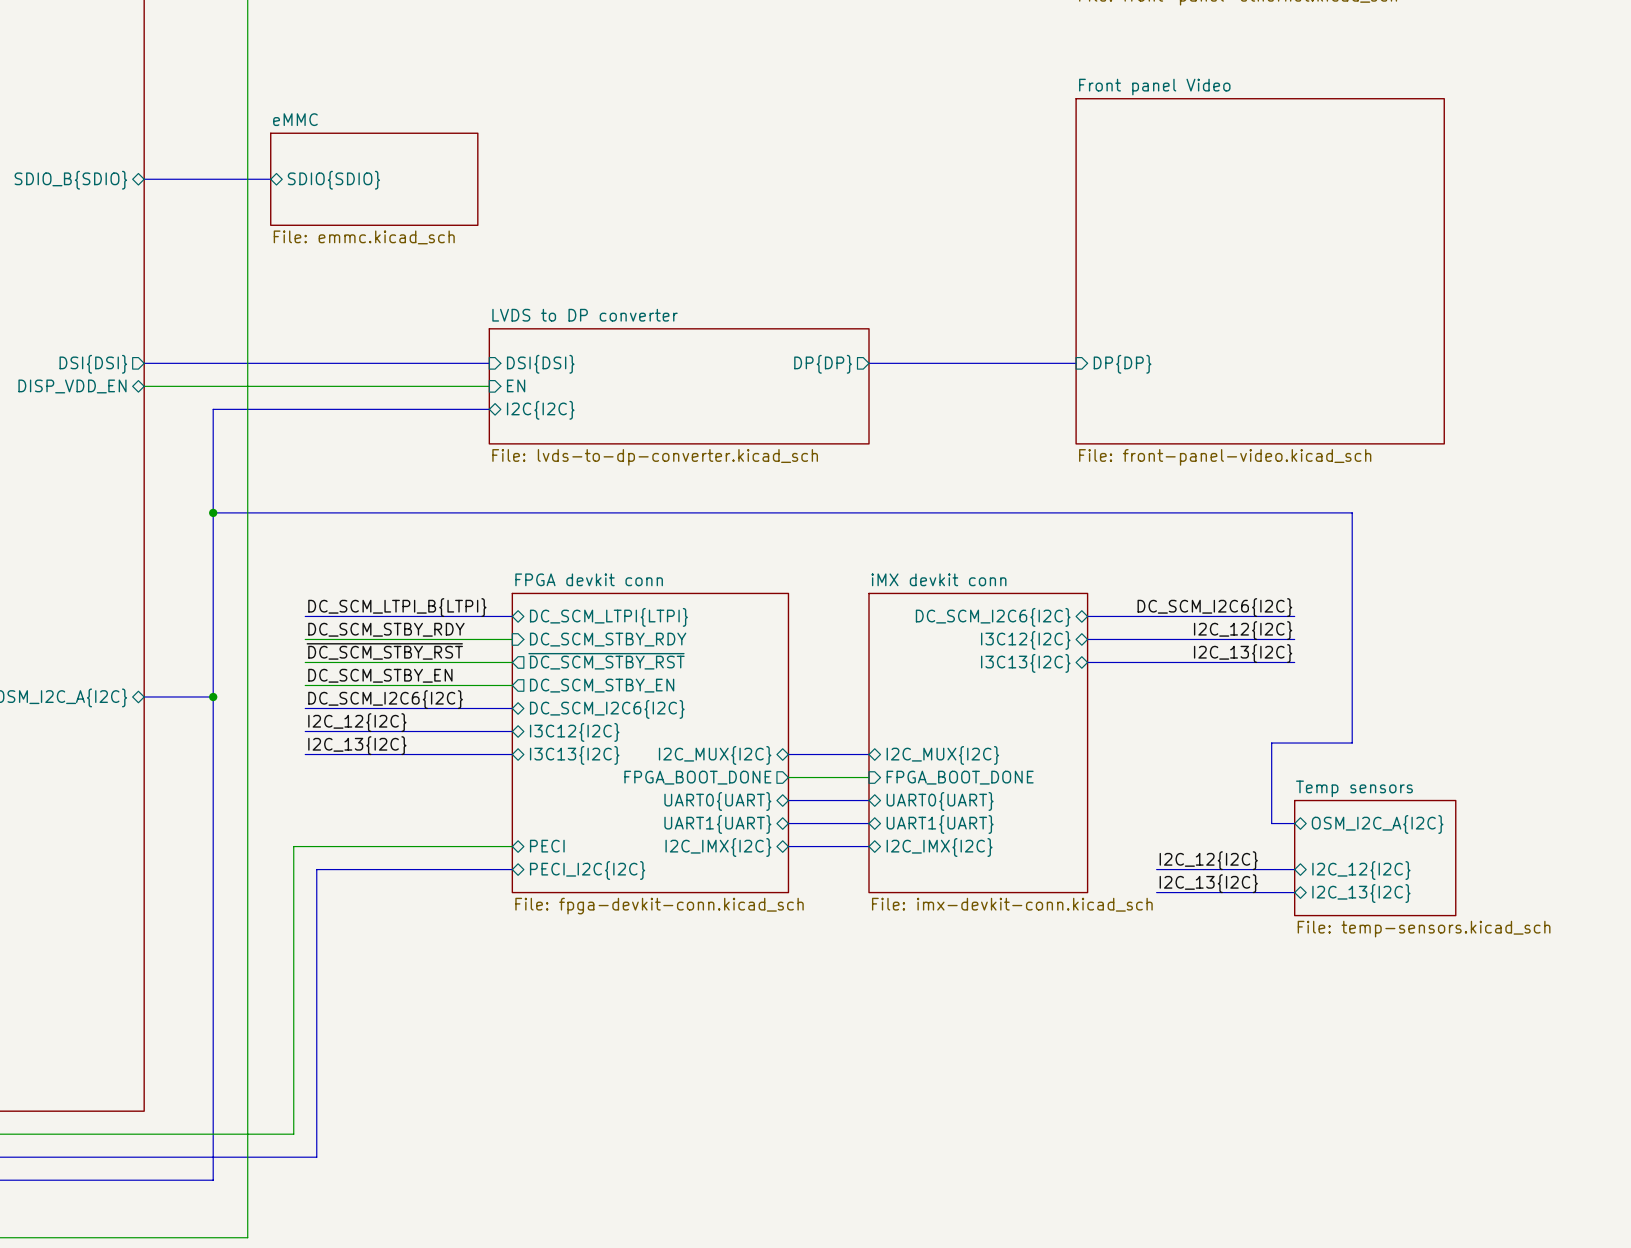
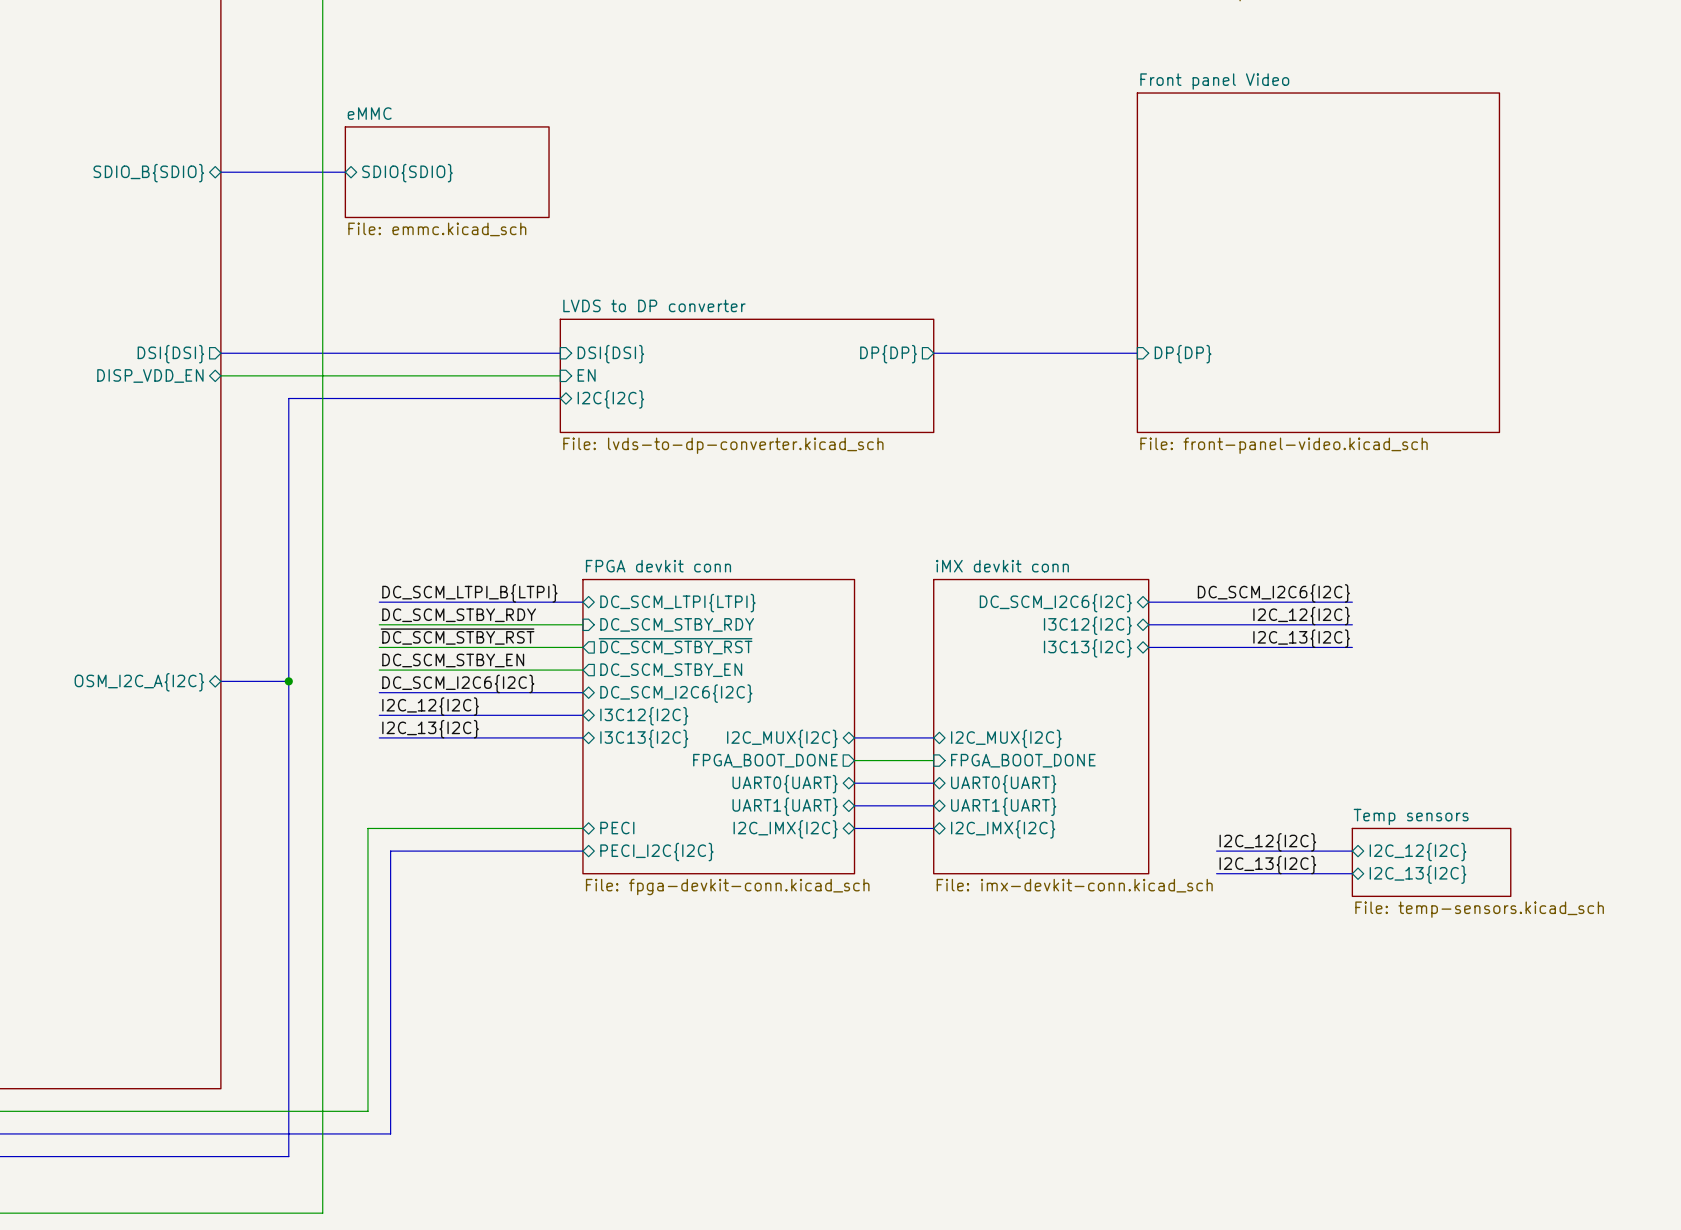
bus: (213, 512) (1352, 512) (1352, 743) (1271, 743) (1271, 823) (1294, 823) -> none
junction: (213, 512) -> none
sheet pin: OSM_I2C_A{I2C} (1377, 824) -> none
sheet Temp sensors: File: temp-sensors.kicad_sch (1375, 858) -> none
sheet Temp sensors: none -> File: temp-sensors.kicad_sch (1431, 862)

